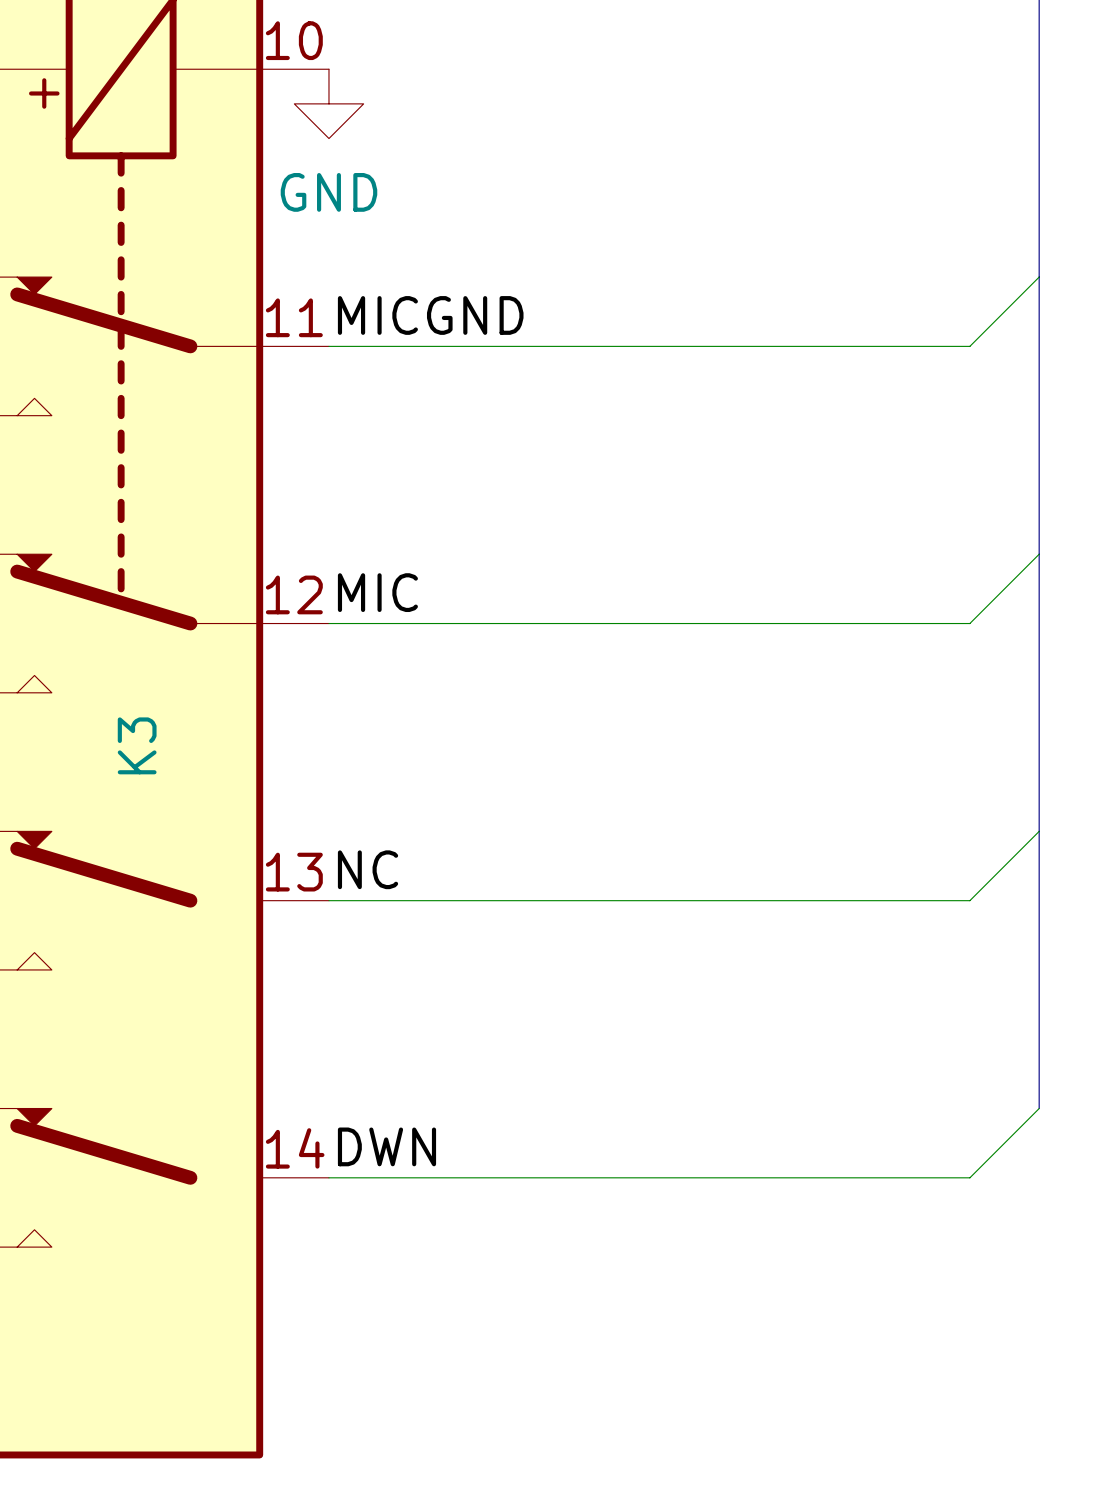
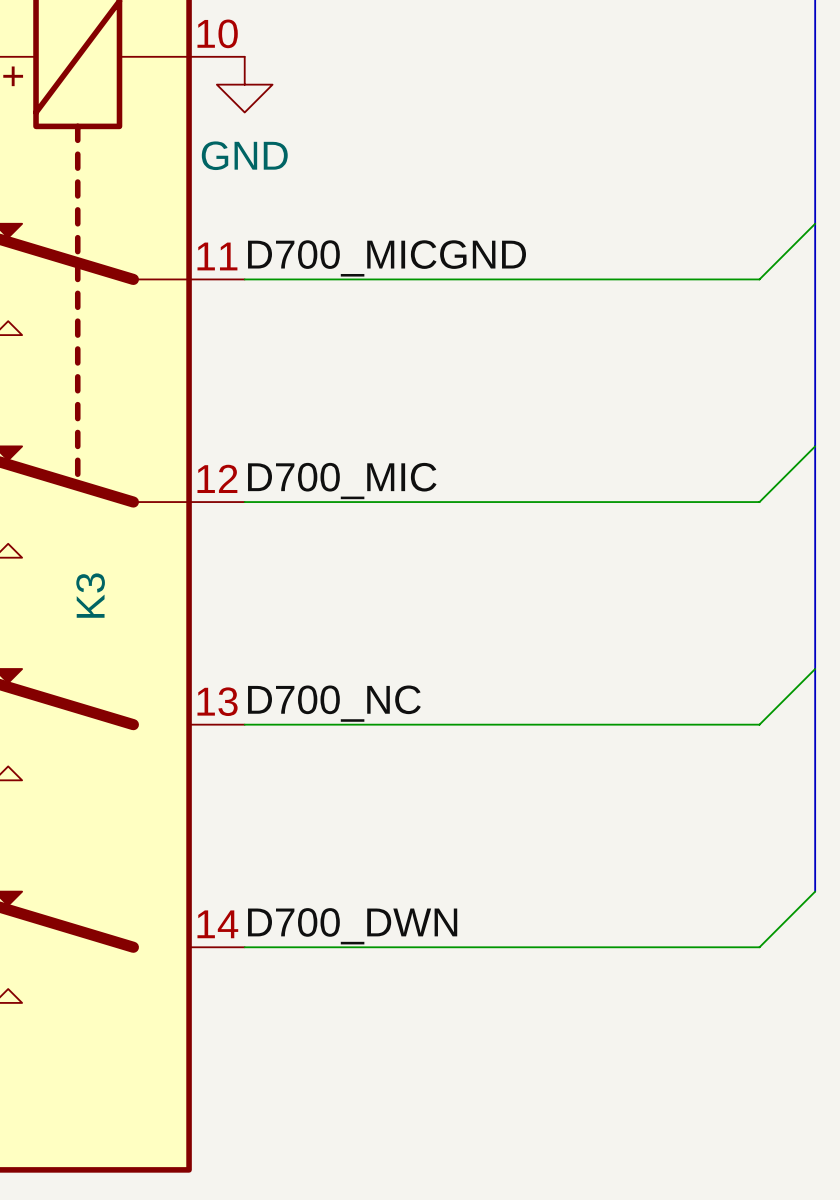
label: MICGND (430, 315) -> D700_MICGND (387, 258)
label: MIC (377, 592) -> D700_MIC (342, 481)
label: NC (368, 869) -> D700_NC (334, 703)
label: DWN (386, 1146) -> D700_DWN (352, 926)

